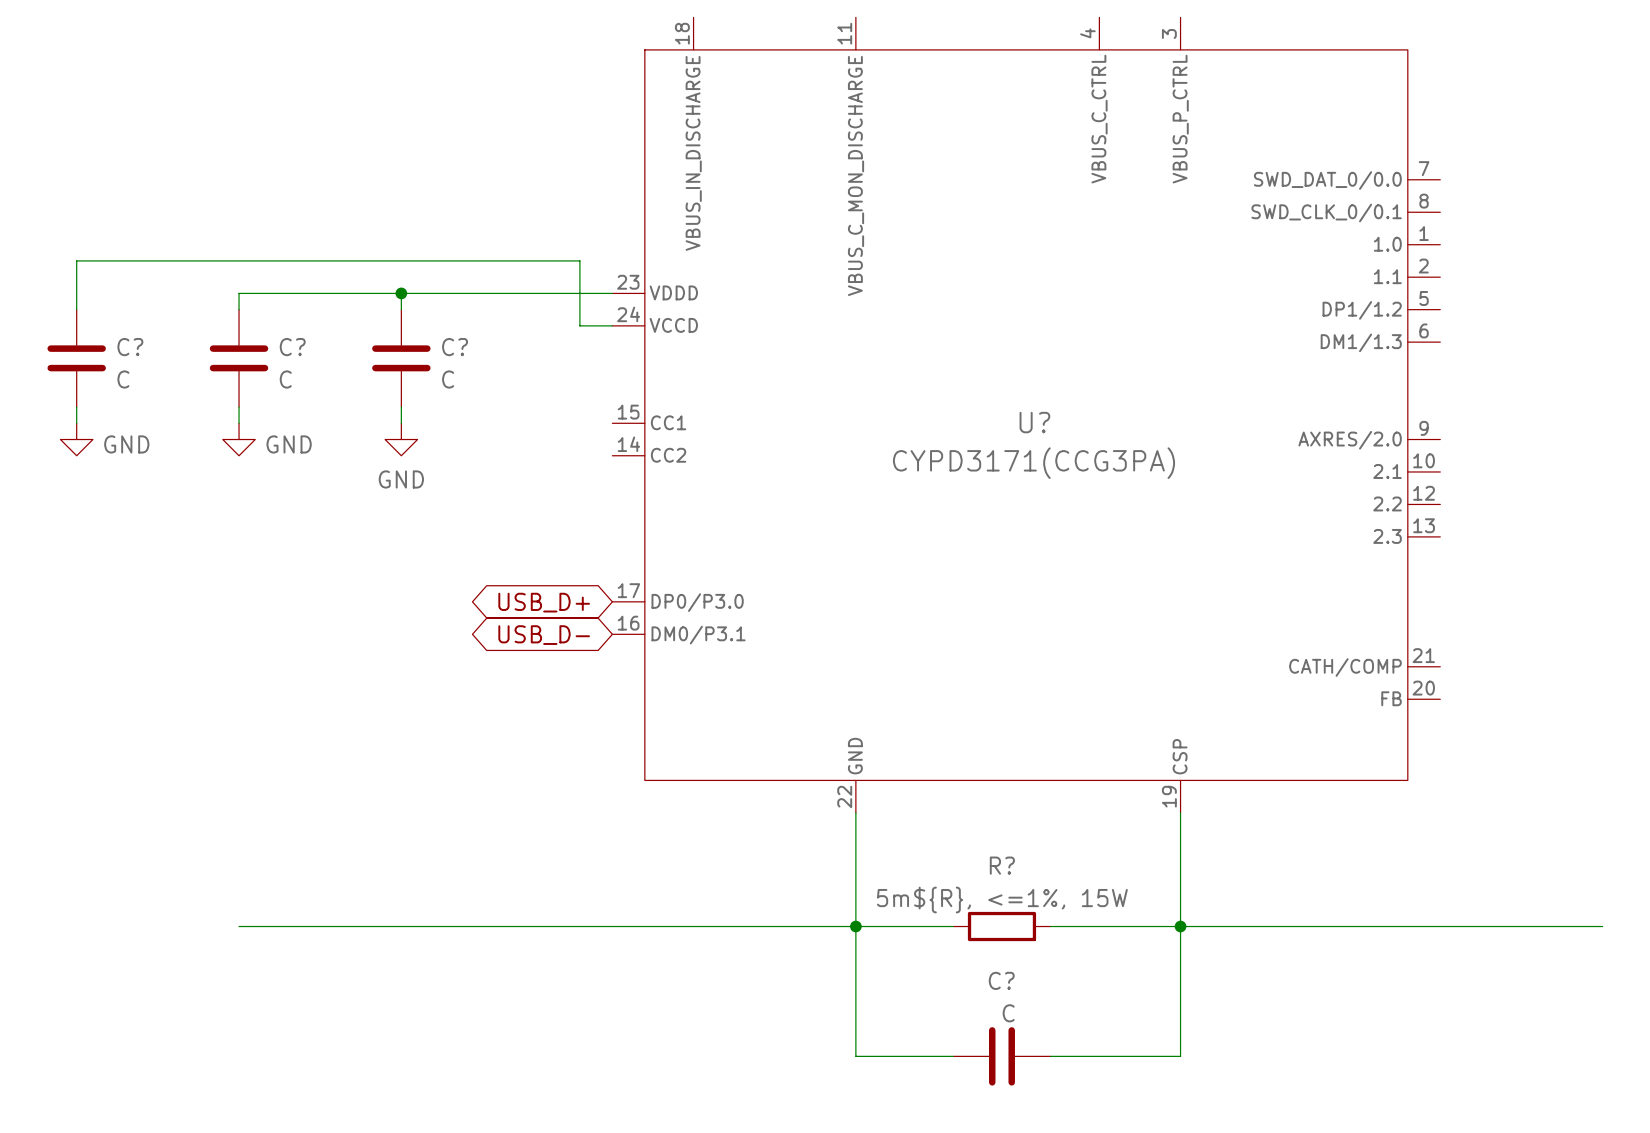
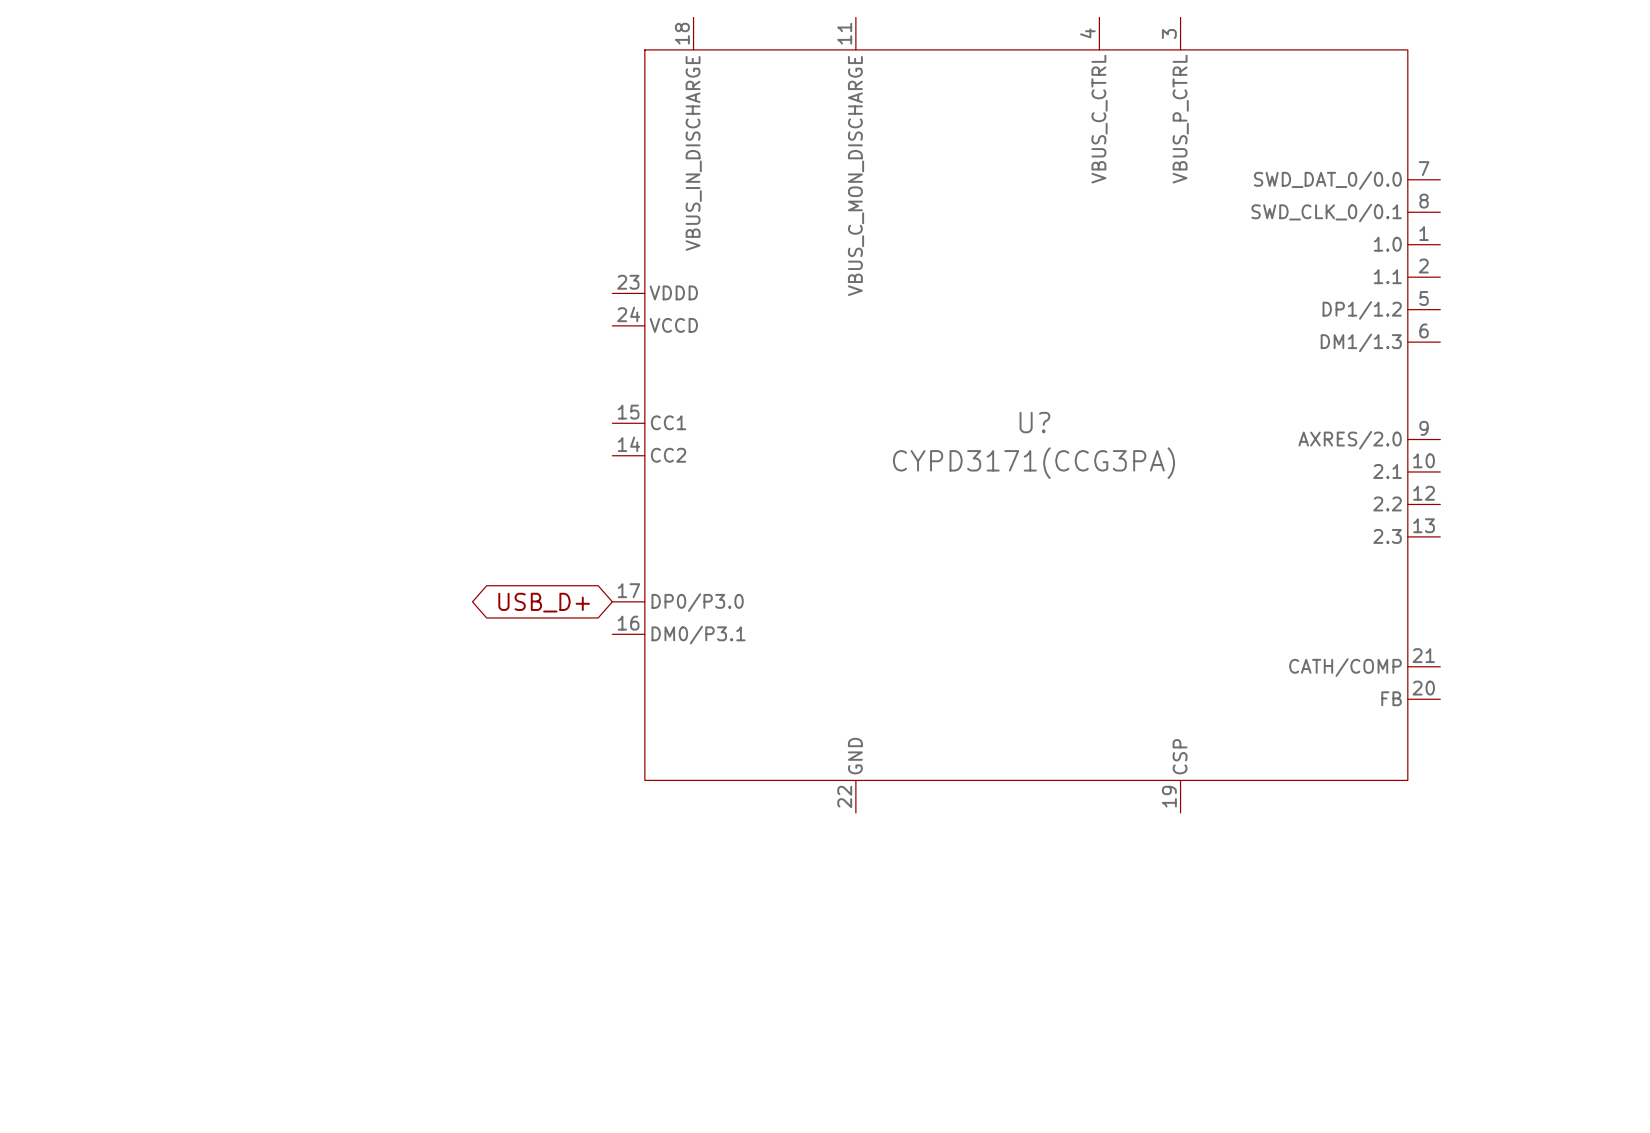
wire: (401, 293) (401, 309) -> none
junction: (401, 293) -> none
wire: (612, 293) (239, 293) (239, 309) -> none
wire: (76, 309) (76, 260) (579, 260) (579, 325) (612, 325) -> none
C?: C (76, 358) -> none
C?: C (239, 358) -> none
C?: C (401, 358) -> none
wire: (76, 407) (76, 423) -> none
wire: (239, 407) (239, 423) -> none
wire: (401, 407) (401, 423) -> none
power symbol: GND (76, 439) -> none
power symbol: GND (239, 439) -> none
power symbol: GND (401, 439) -> none
global label: USB_D- (544, 635) -> none
wire: (855, 812) (855, 1056) (953, 1056) -> none
wire: (1180, 812) (1180, 1056) (1050, 1056) -> none
wire: (239, 926) (953, 926) -> none
junction: (855, 926) -> none
R?: 5m${R}, <=1%, 15W (1001, 926) -> none
wire: (1050, 926) (1602, 926) -> none
junction: (1180, 926) -> none
C?: C (1001, 1056) -> none

